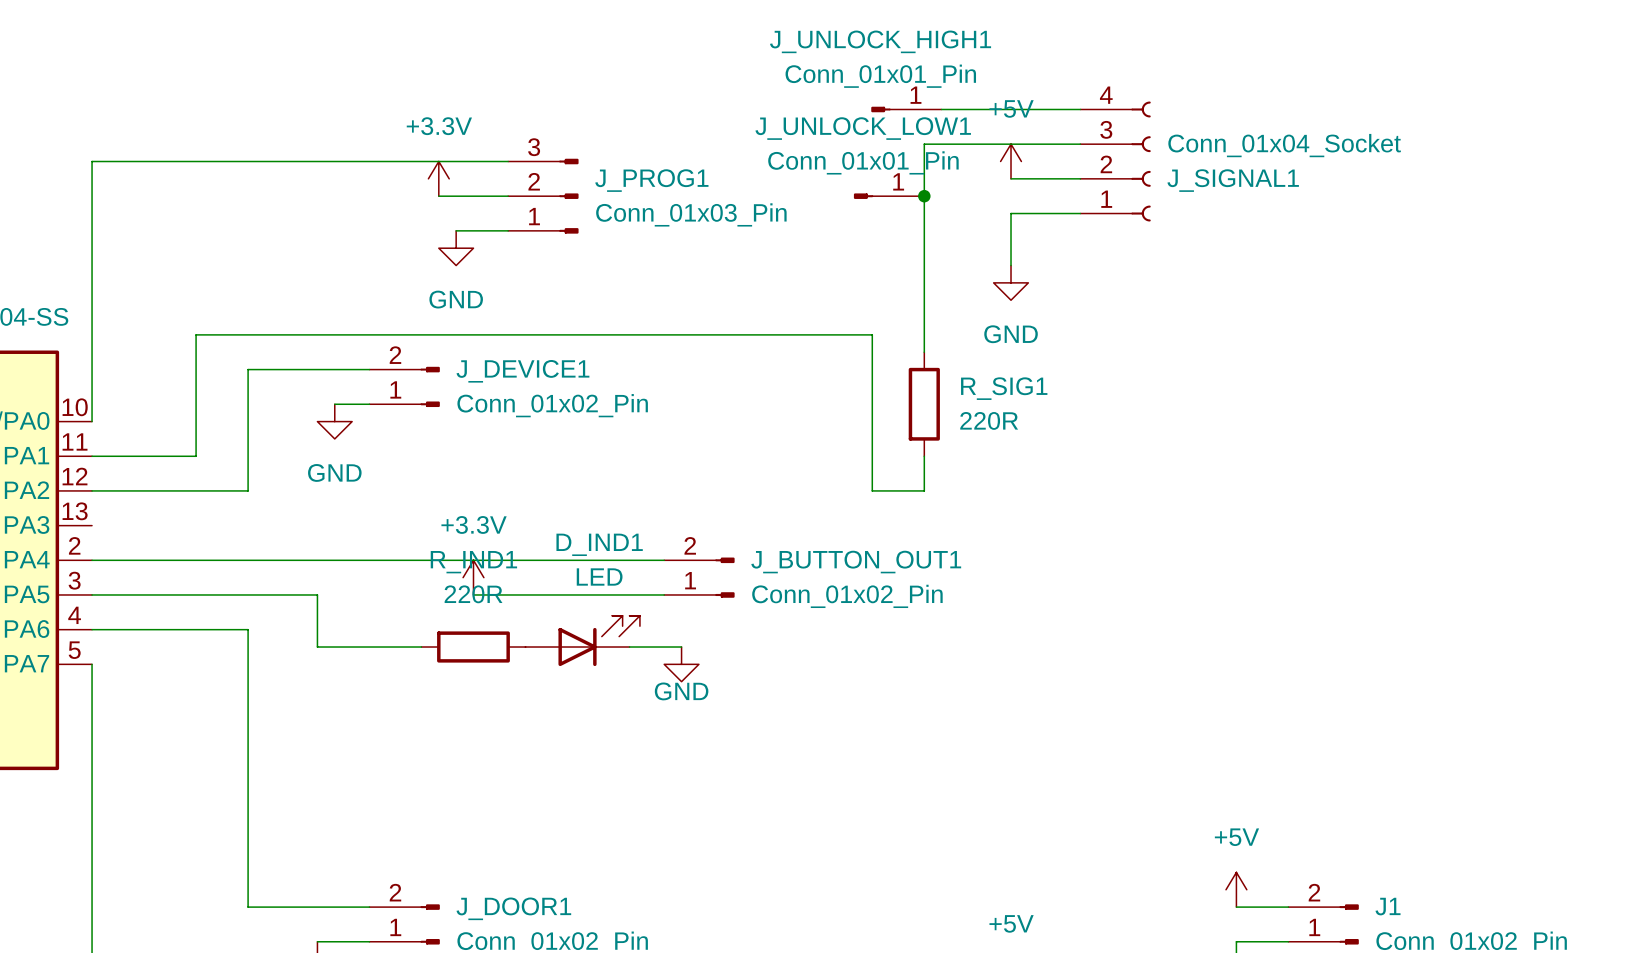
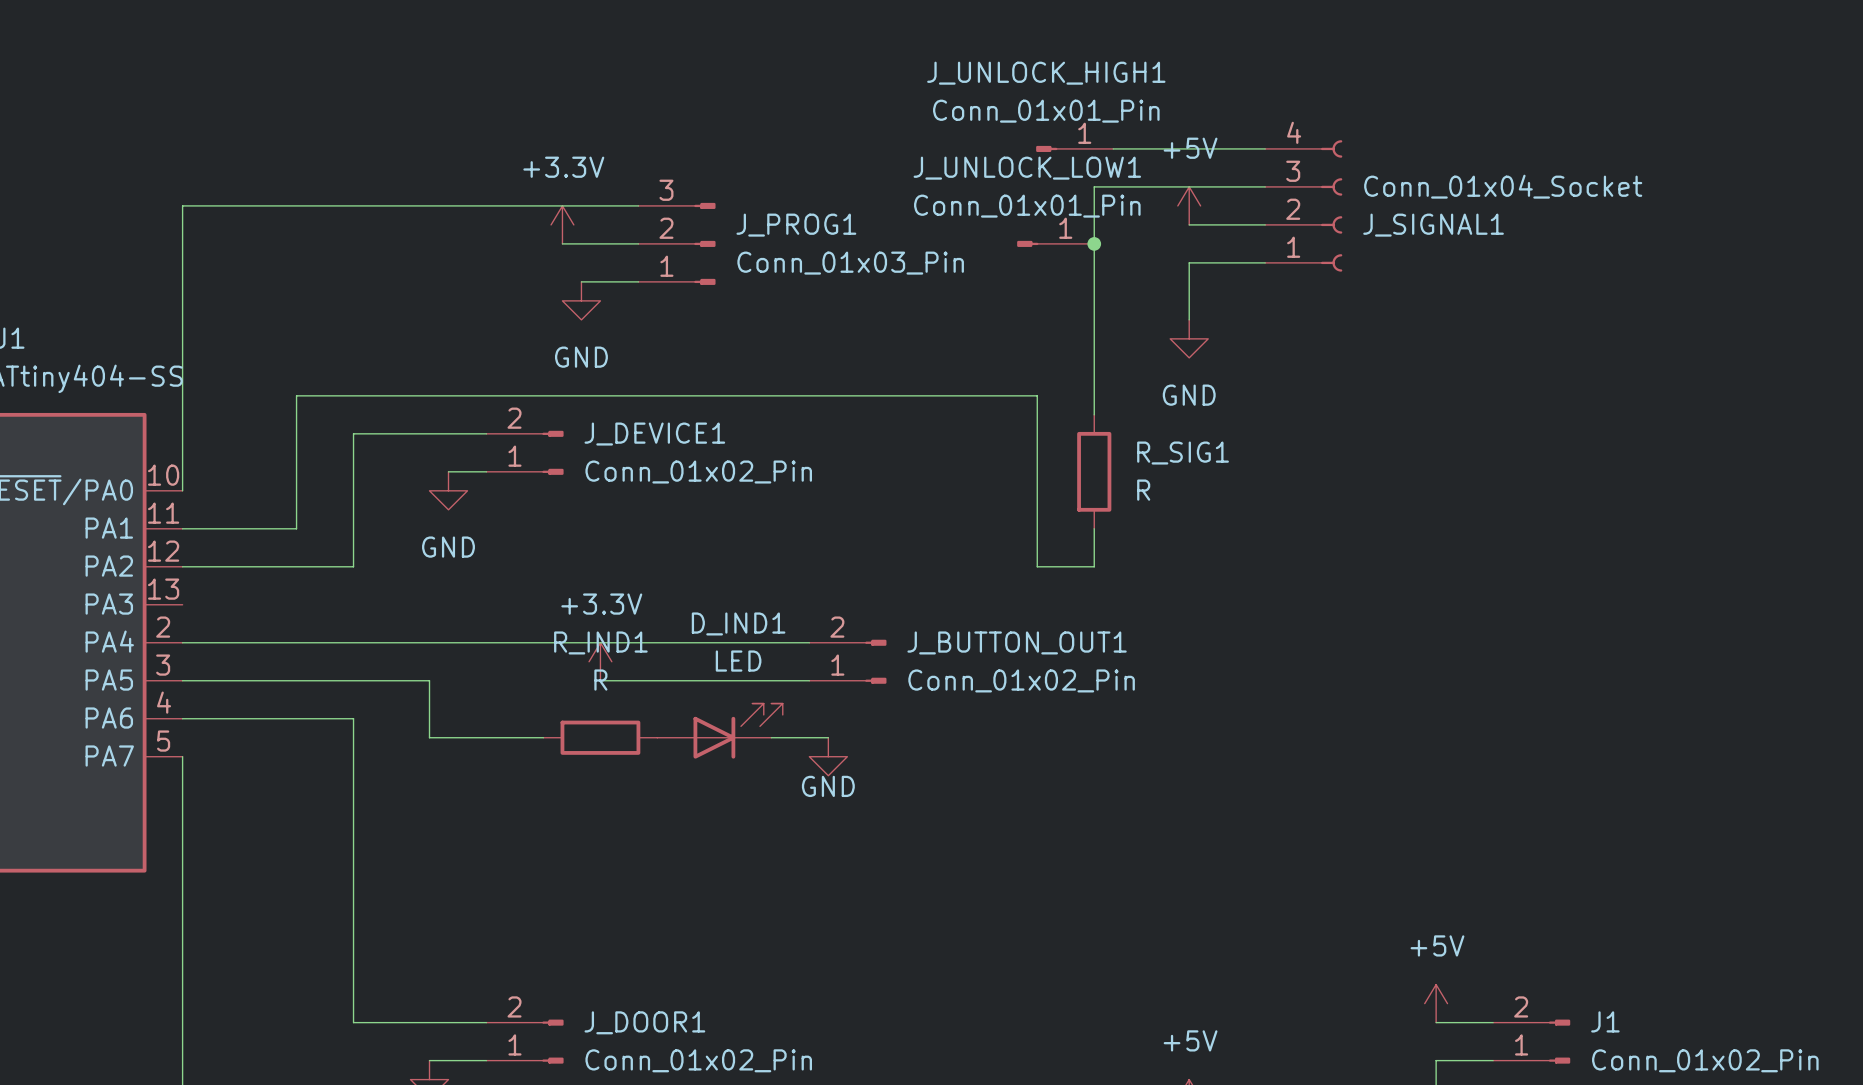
R_SIG1 value: 220R (989, 420) -> R (1143, 490)
R_IND1 value: 220R (473, 594) -> R (600, 680)

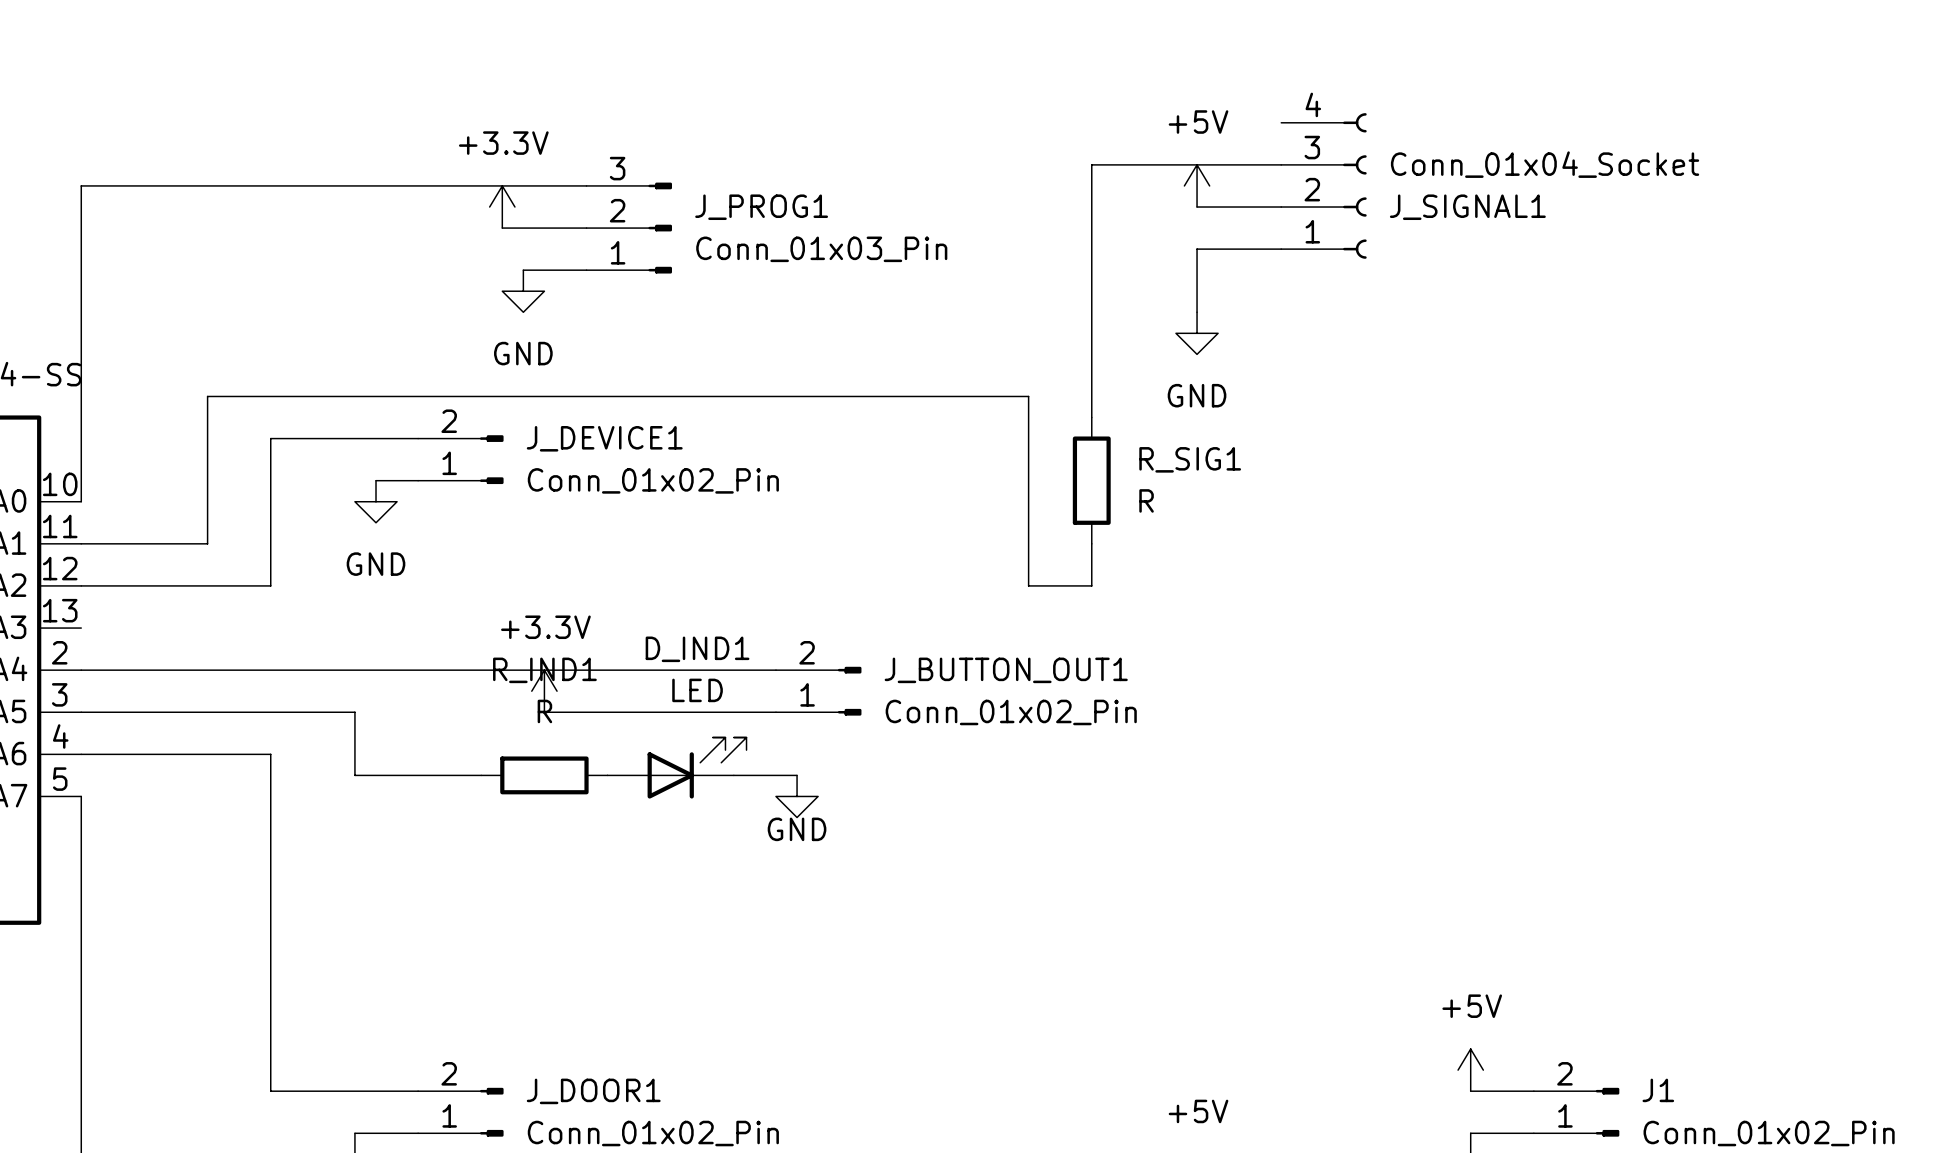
J_UNLOCK_HIGH1: Conn_01x01_Pin (1074, 148) -> none
wire: (1113, 148) (1265, 148) -> none
J_UNLOCK_LOW1: Conn_01x01_Pin (1055, 243) -> none
junction: (1094, 243) -> none

